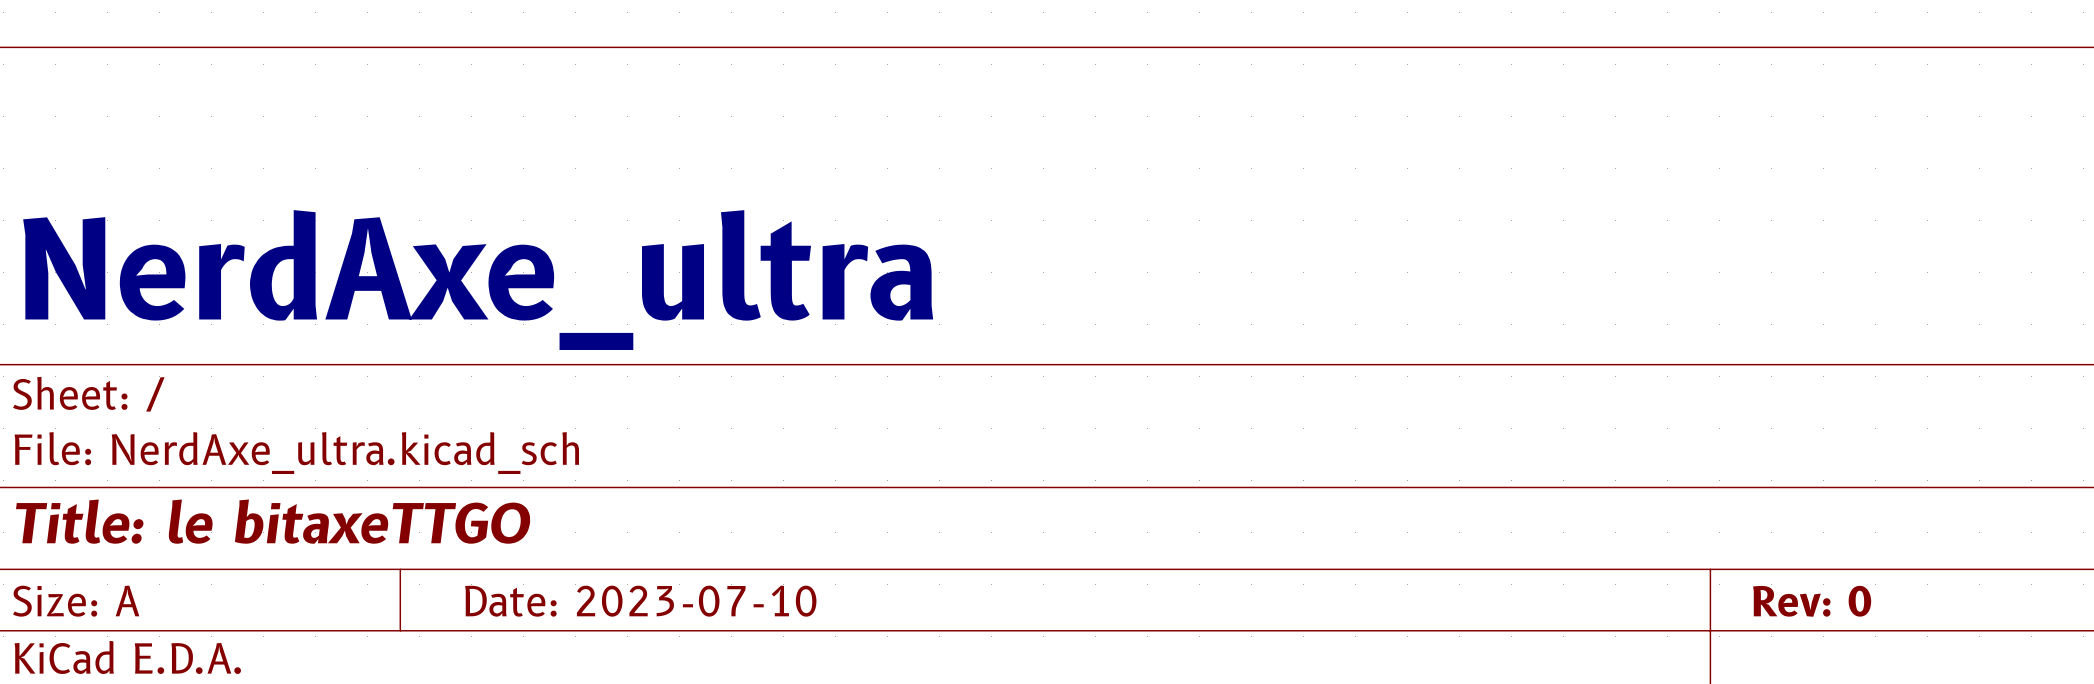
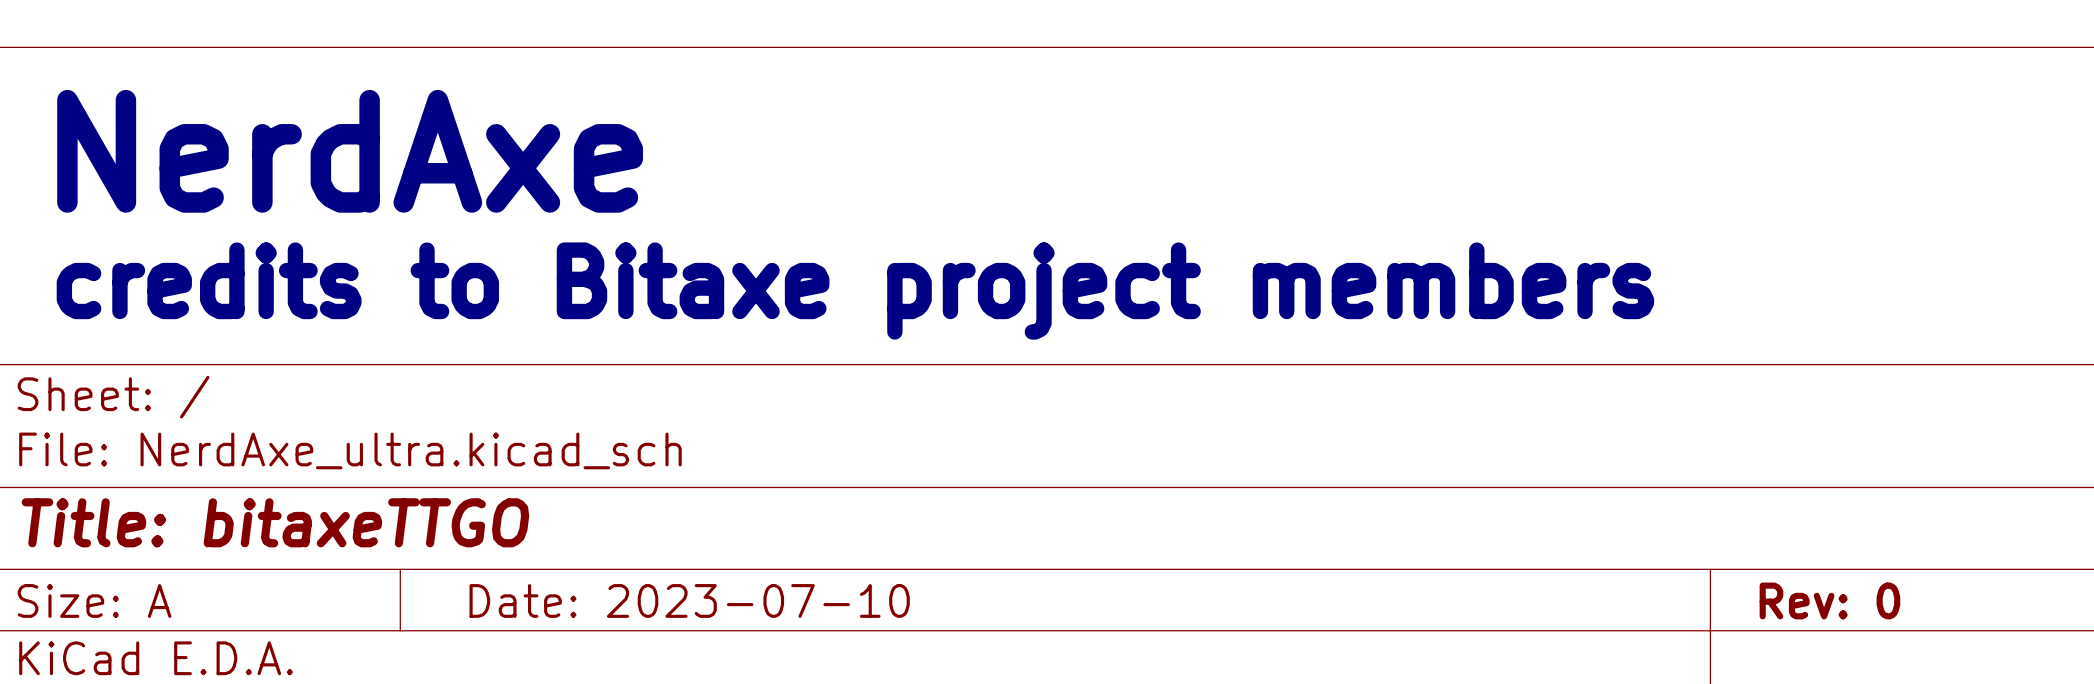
text: NerdAxe_ultra (478, 280) -> NerdAxe (350, 151)
text: none -> credits to Bitaxe project members (855, 291)
title block: Title: le bitaxeTTGO (273, 521) -> Title: bitaxeTTGO (275, 522)

